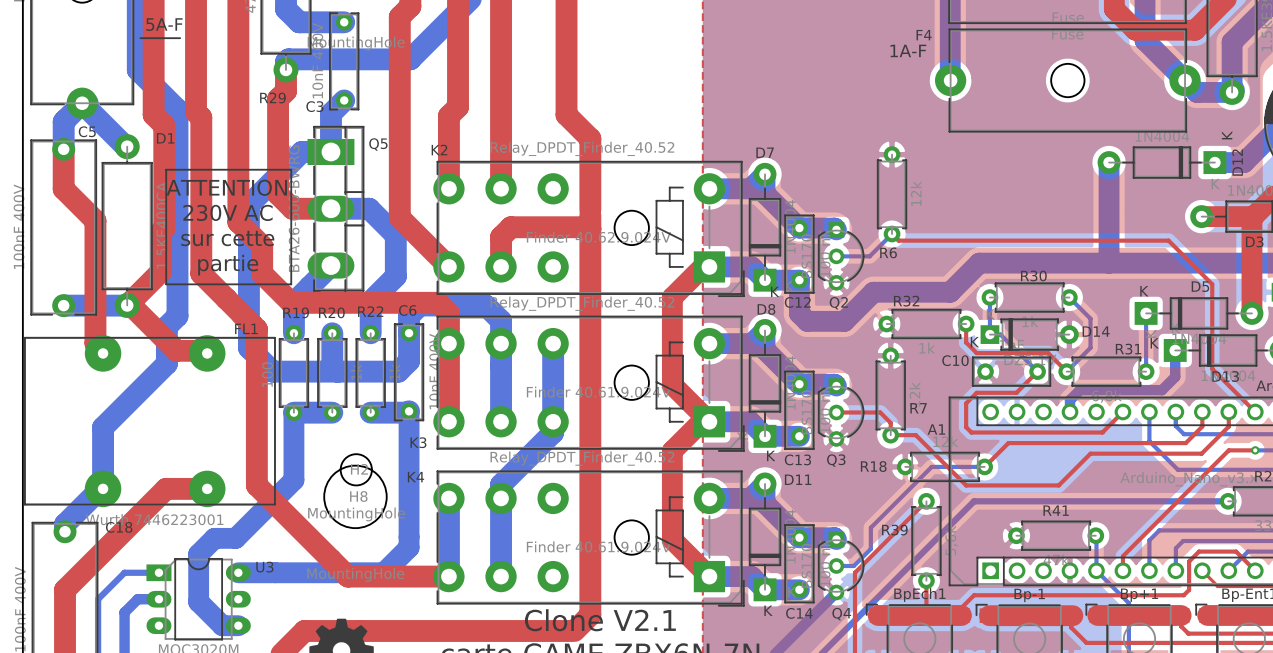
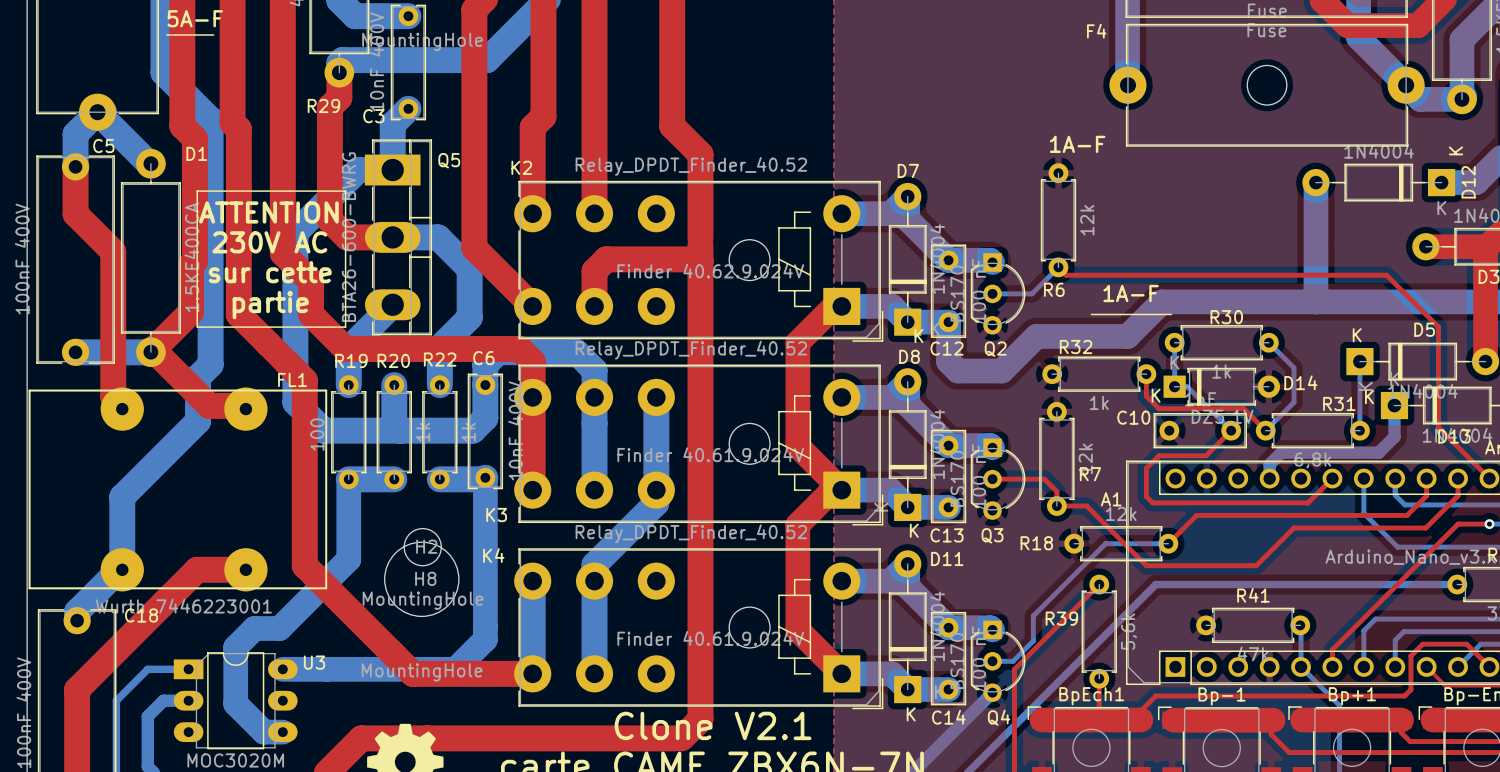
text position: 1A-F (908, 50) -> 1A-F (1077, 144)
text: none -> 1A-F (1131, 293)
line: none -> (1091, 314) (1171, 314)

